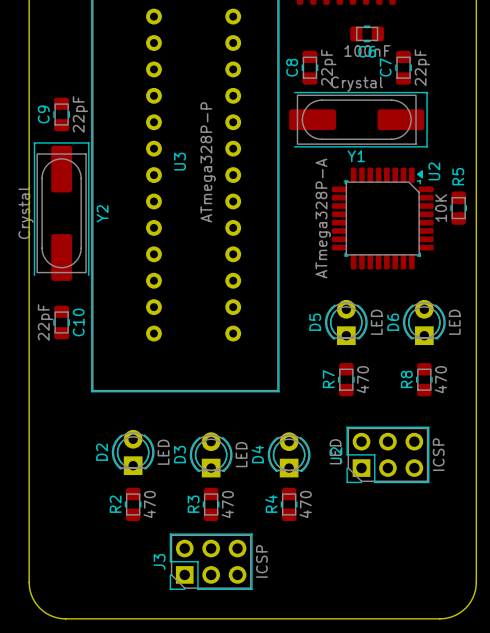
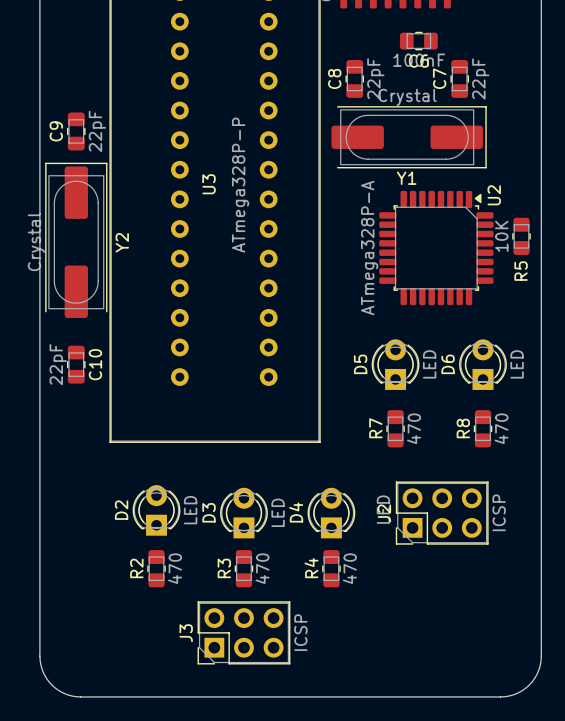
R5 name position: R5 (458, 176) -> R5 (521, 271)

